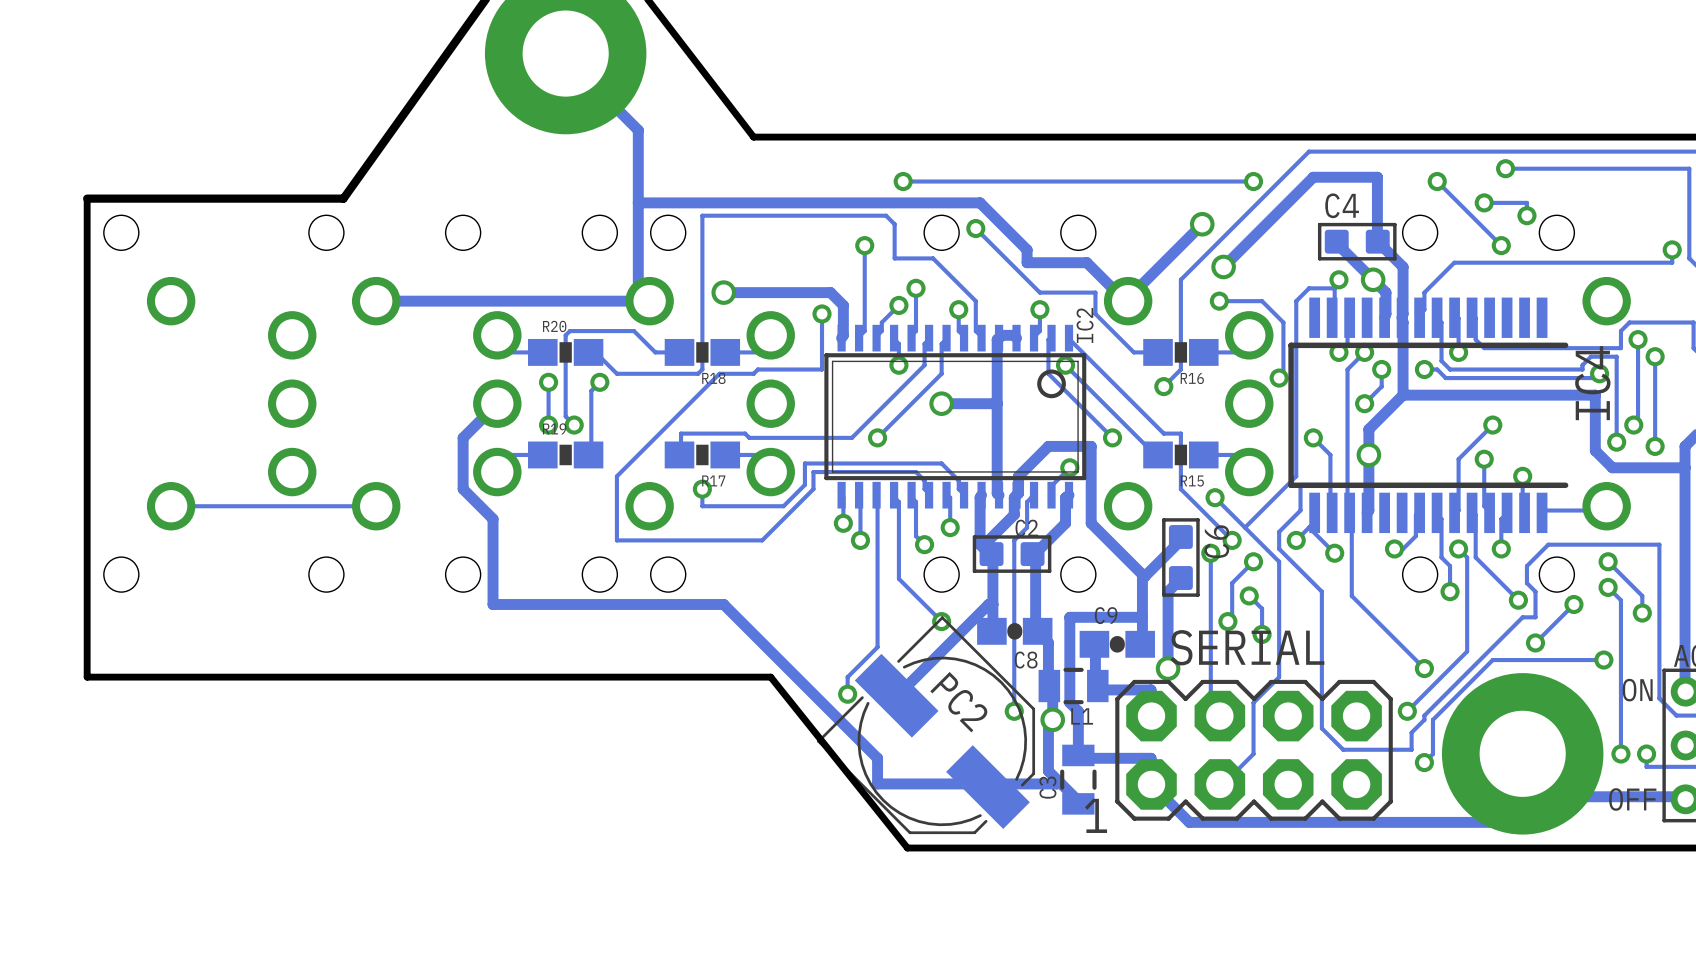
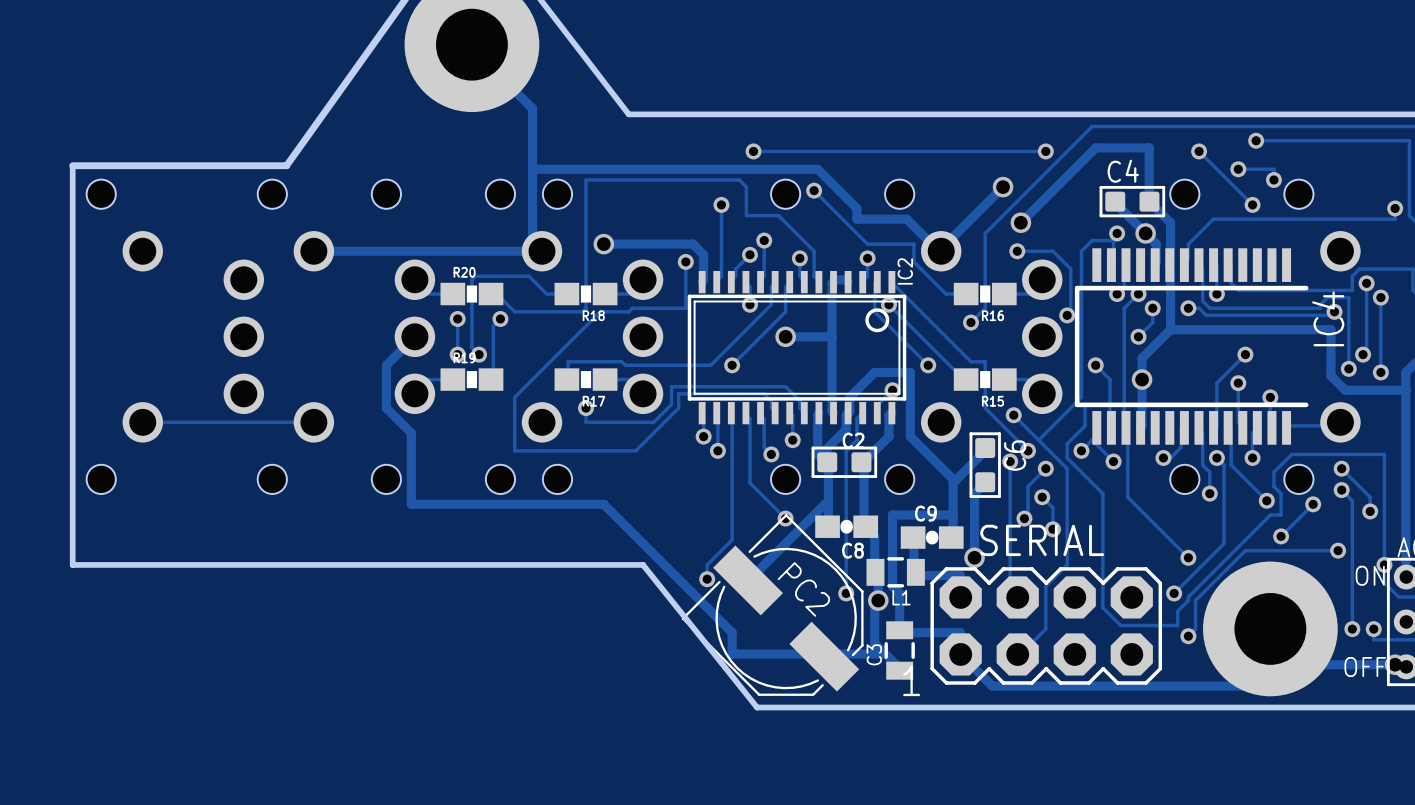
via: none -> (1384, 564)
via: none -> (1395, 664)

